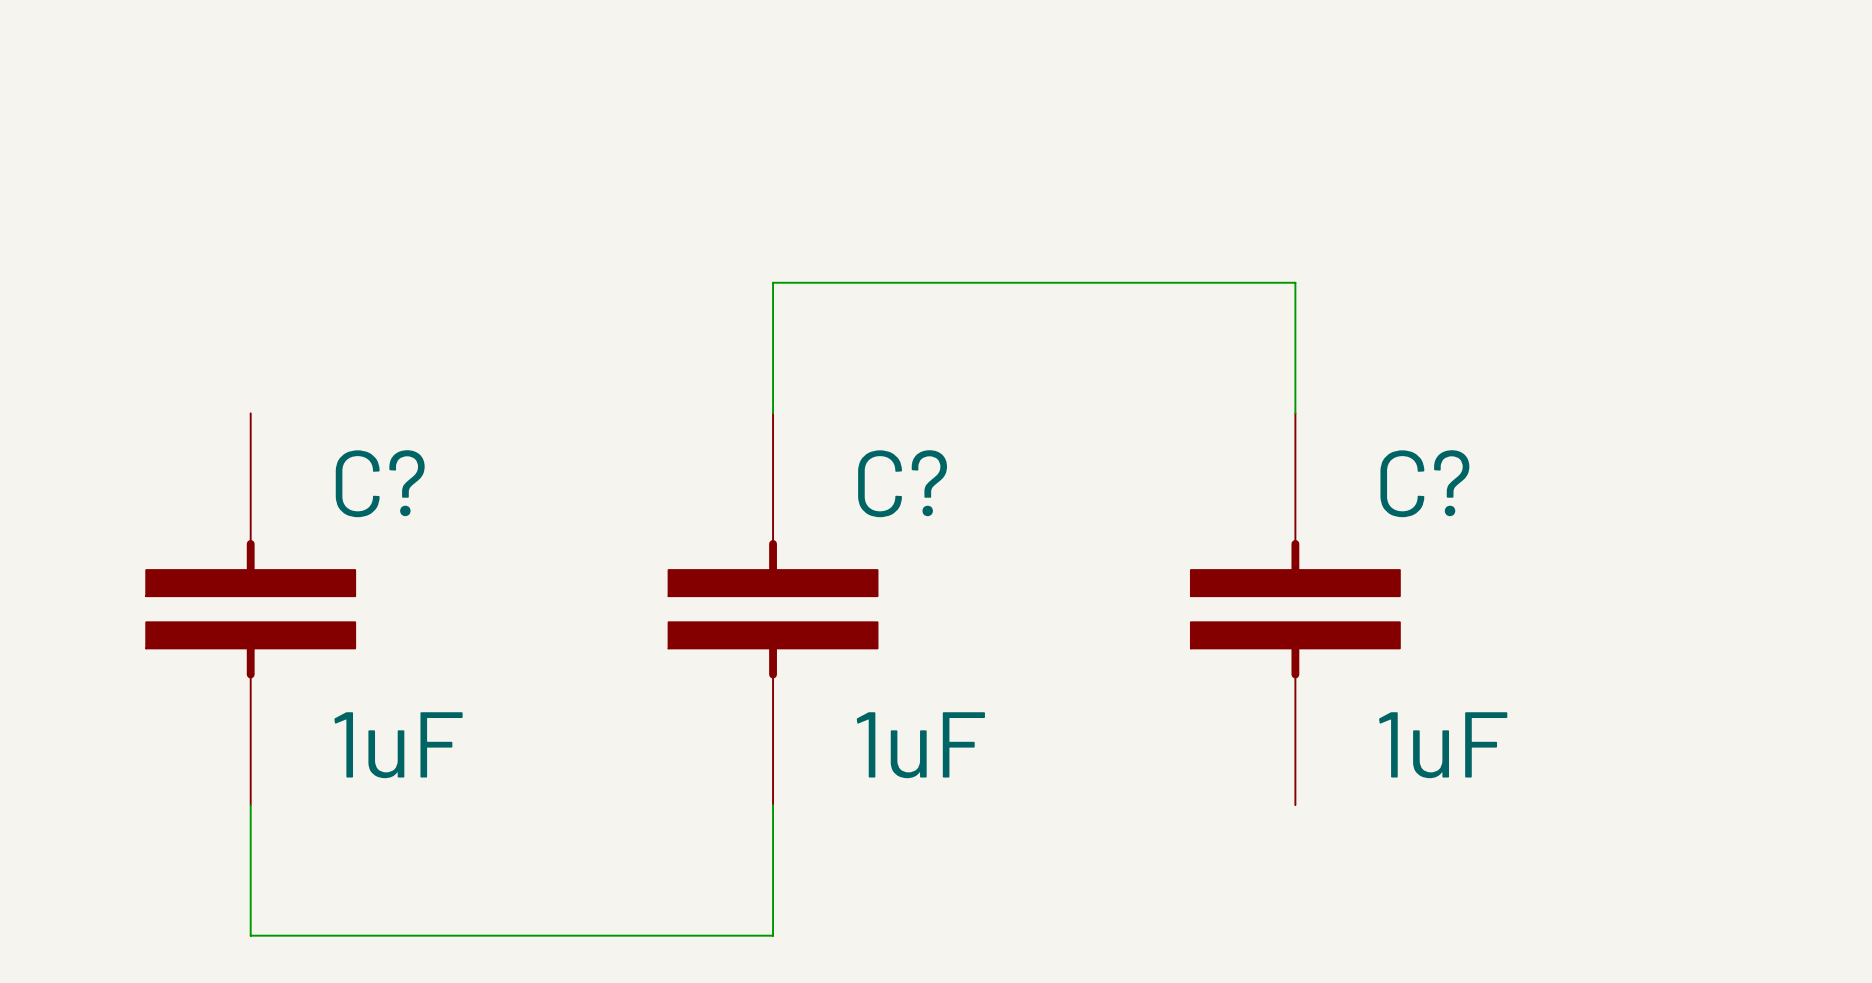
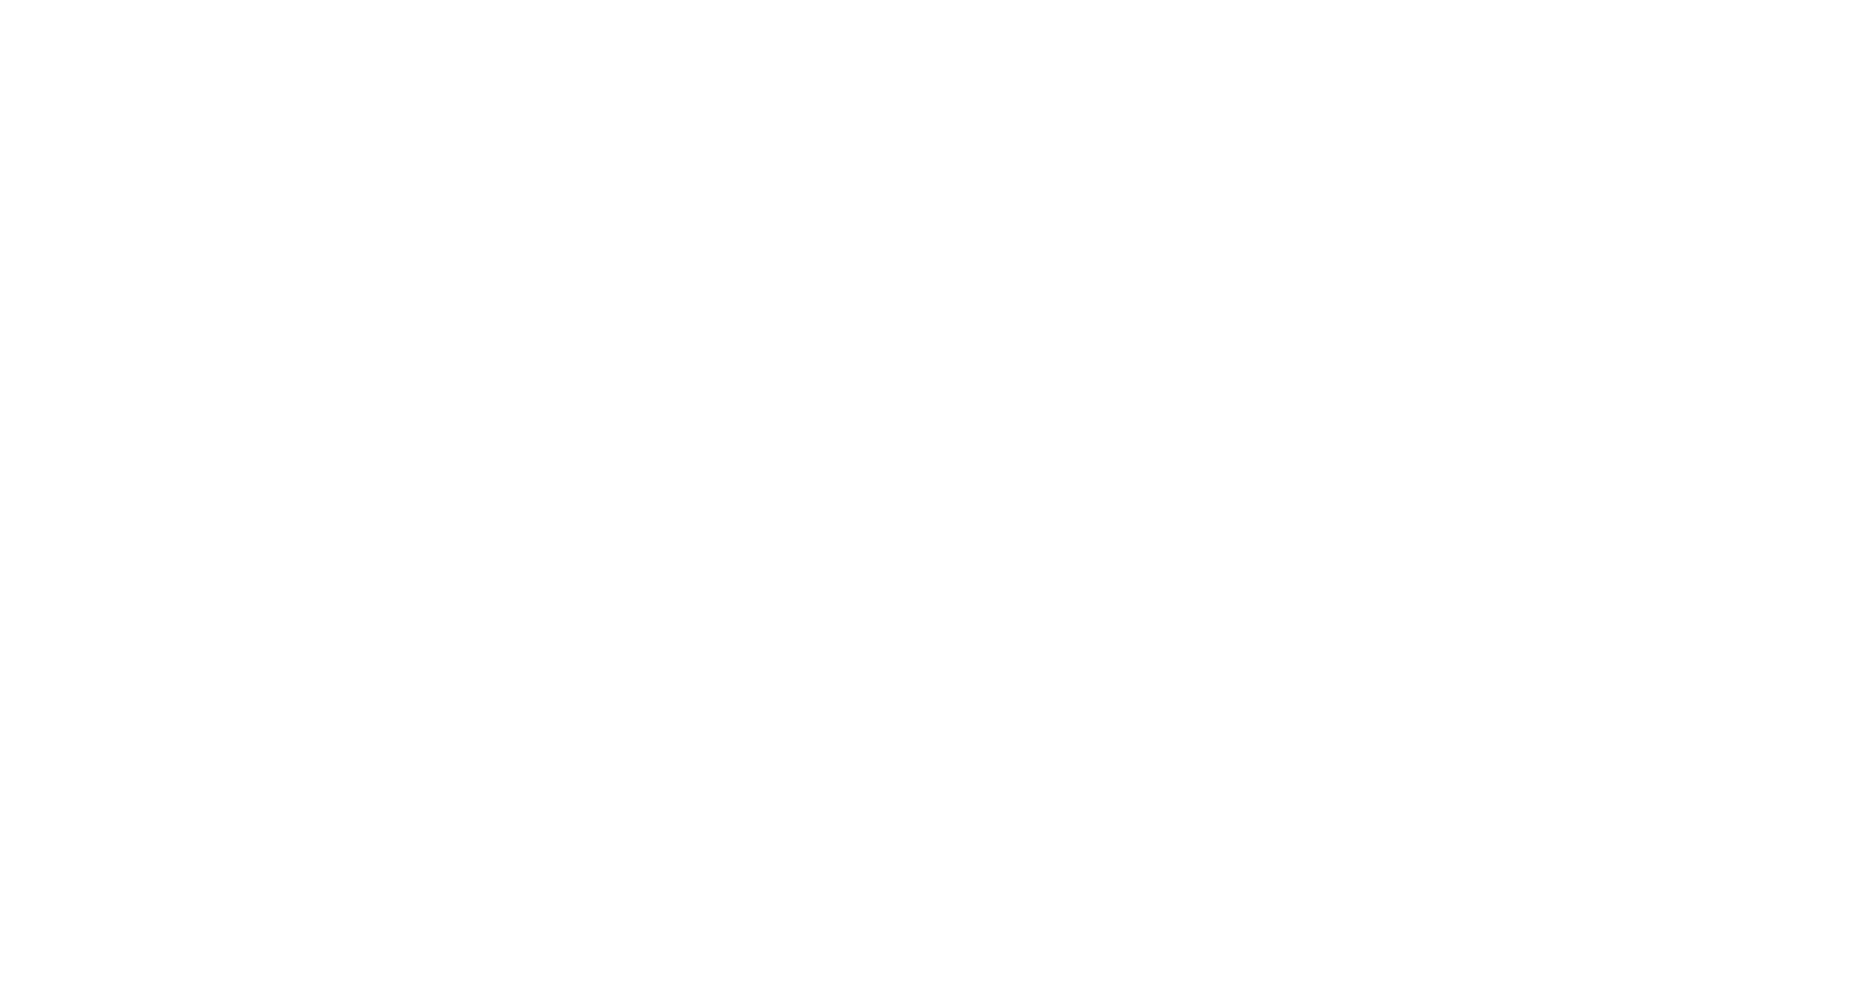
wire: (773, 413) (773, 282) (1295, 282) (1295, 413) -> none
C?: 1uF (250, 609) -> none
C?: 1uF (773, 609) -> none
C?: 1uF (1295, 609) -> none
wire: (250, 805) (250, 935) (773, 935) (773, 805) -> none

